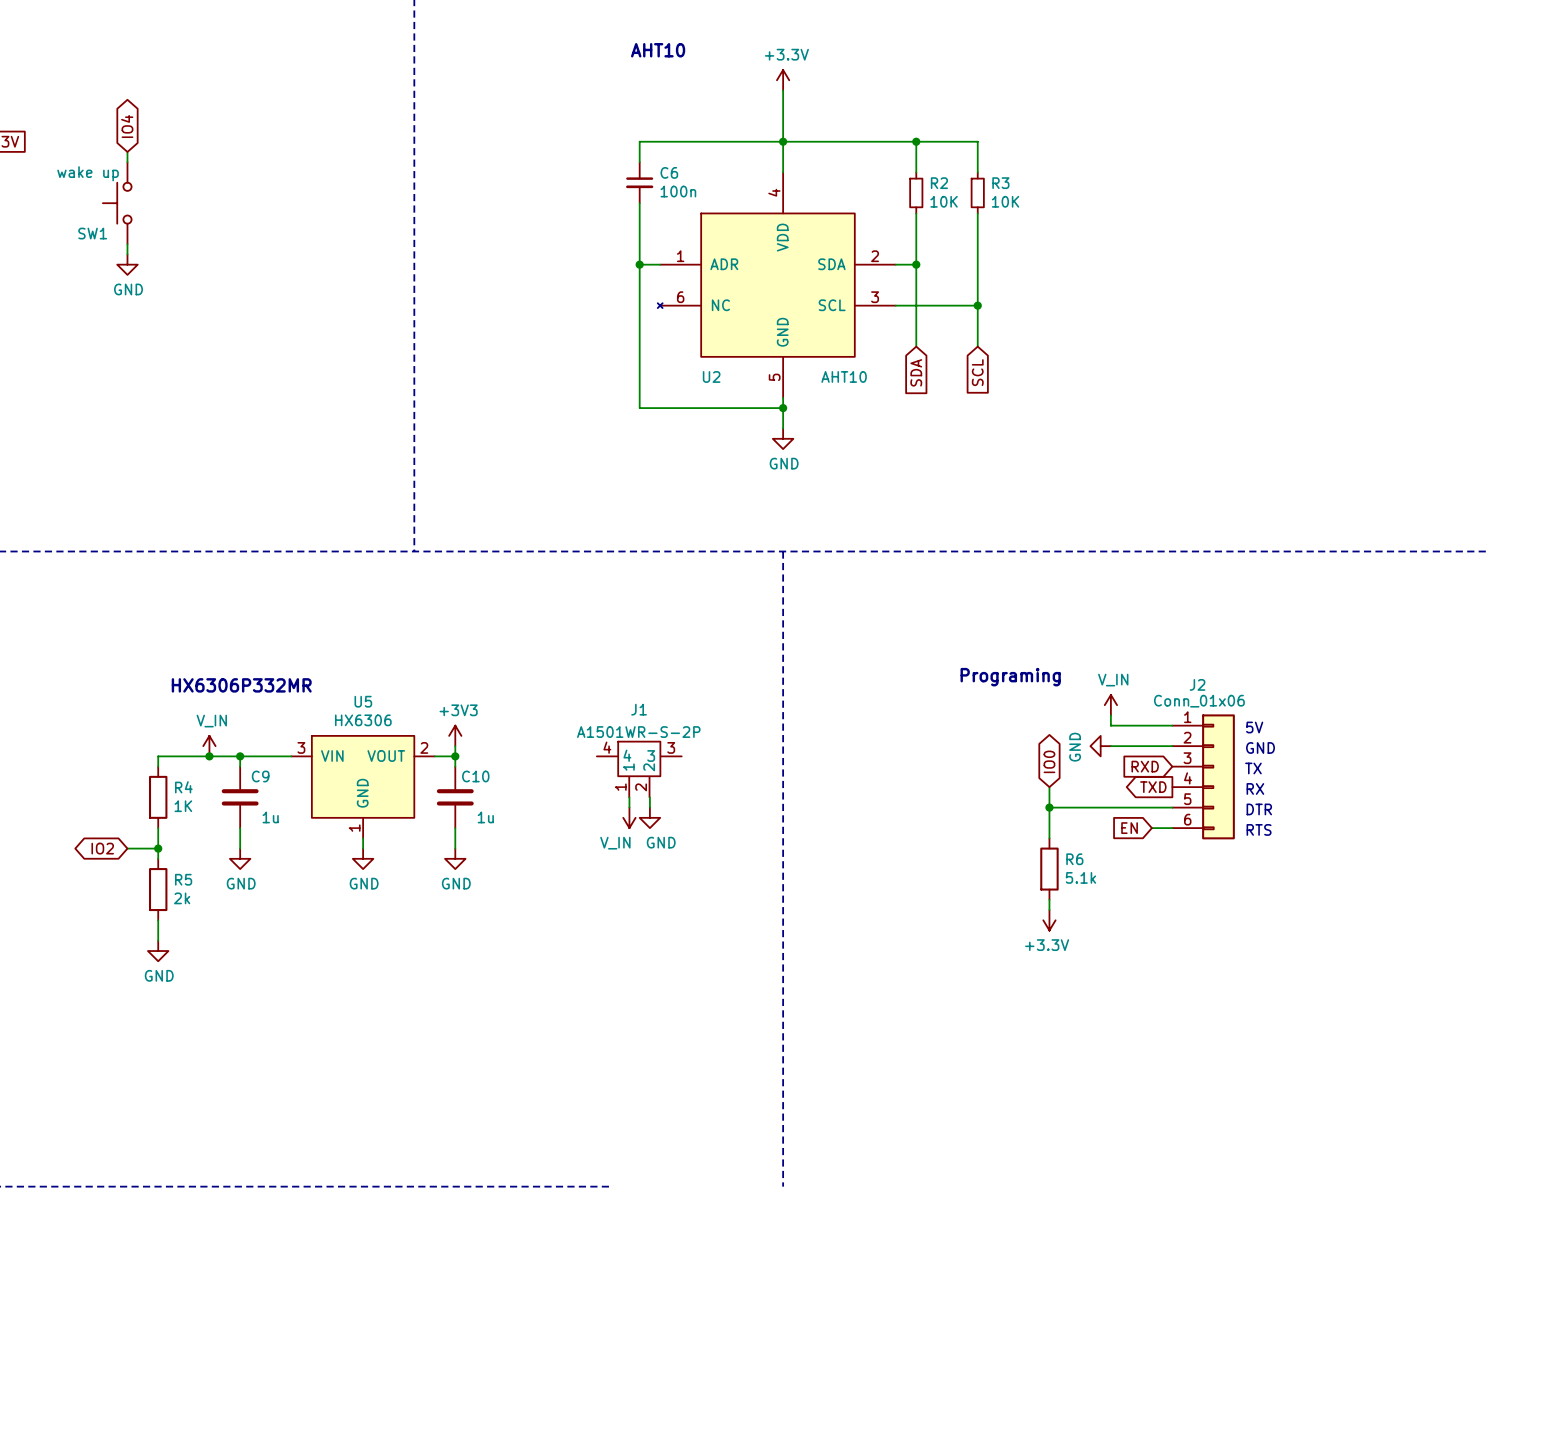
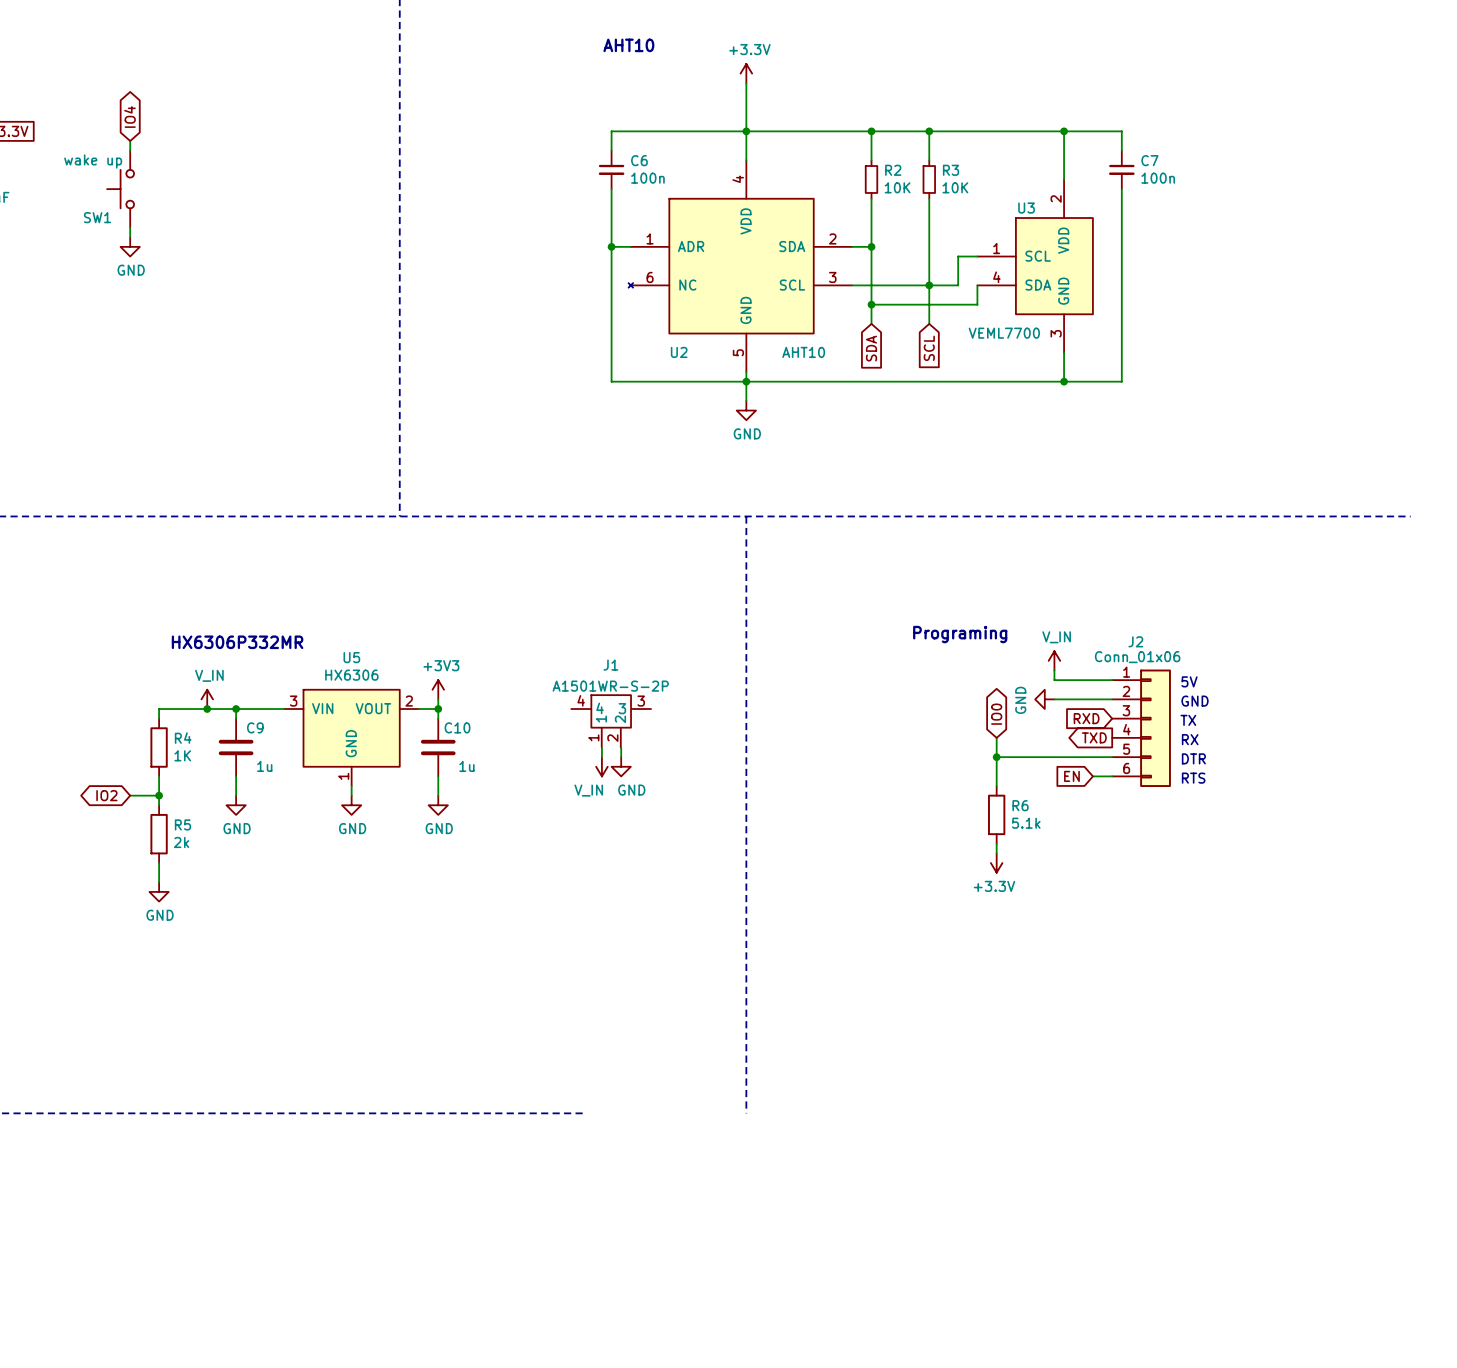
wire: none -> (929, 131) (1121, 131) (1121, 150)
junction: none -> (929, 131)
wire: none -> (1064, 131) (1064, 179)
junction: none -> (1064, 131)
C7: none -> 100n (1121, 169)
wire: none -> (1121, 189) (1121, 381) (746, 381)
wire: none -> (977, 256) (958, 256) (958, 285) (929, 285)
U3: none -> VEML7700 (1035, 266)
wire: none -> (977, 285) (977, 304) (871, 304)
junction: none -> (871, 304)
wire: none -> (1064, 352) (1064, 381)
junction: none -> (1064, 381)

